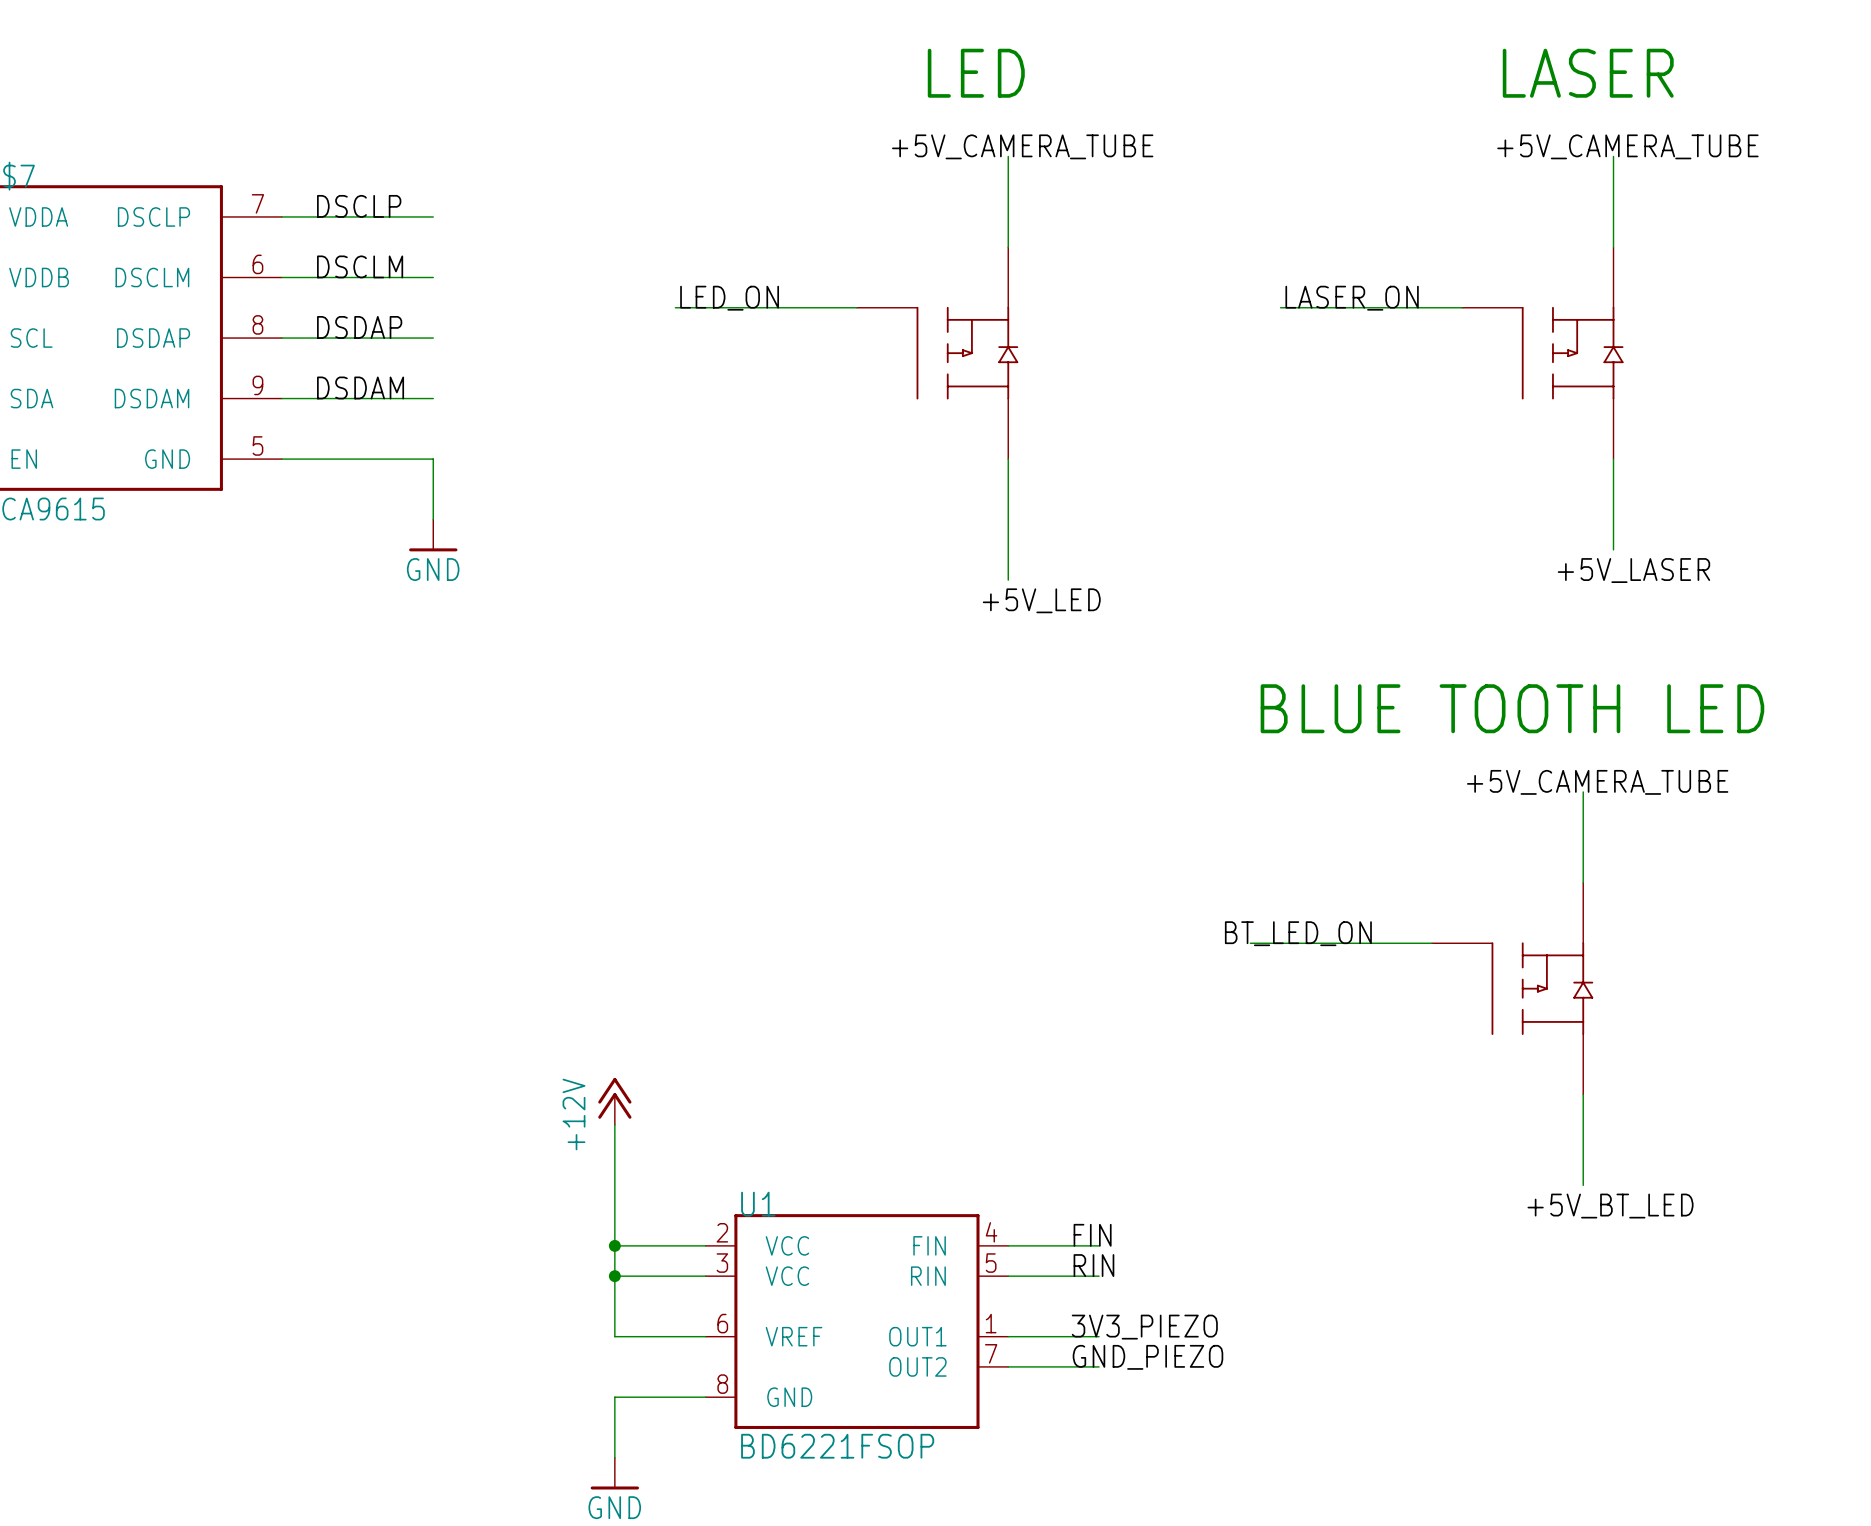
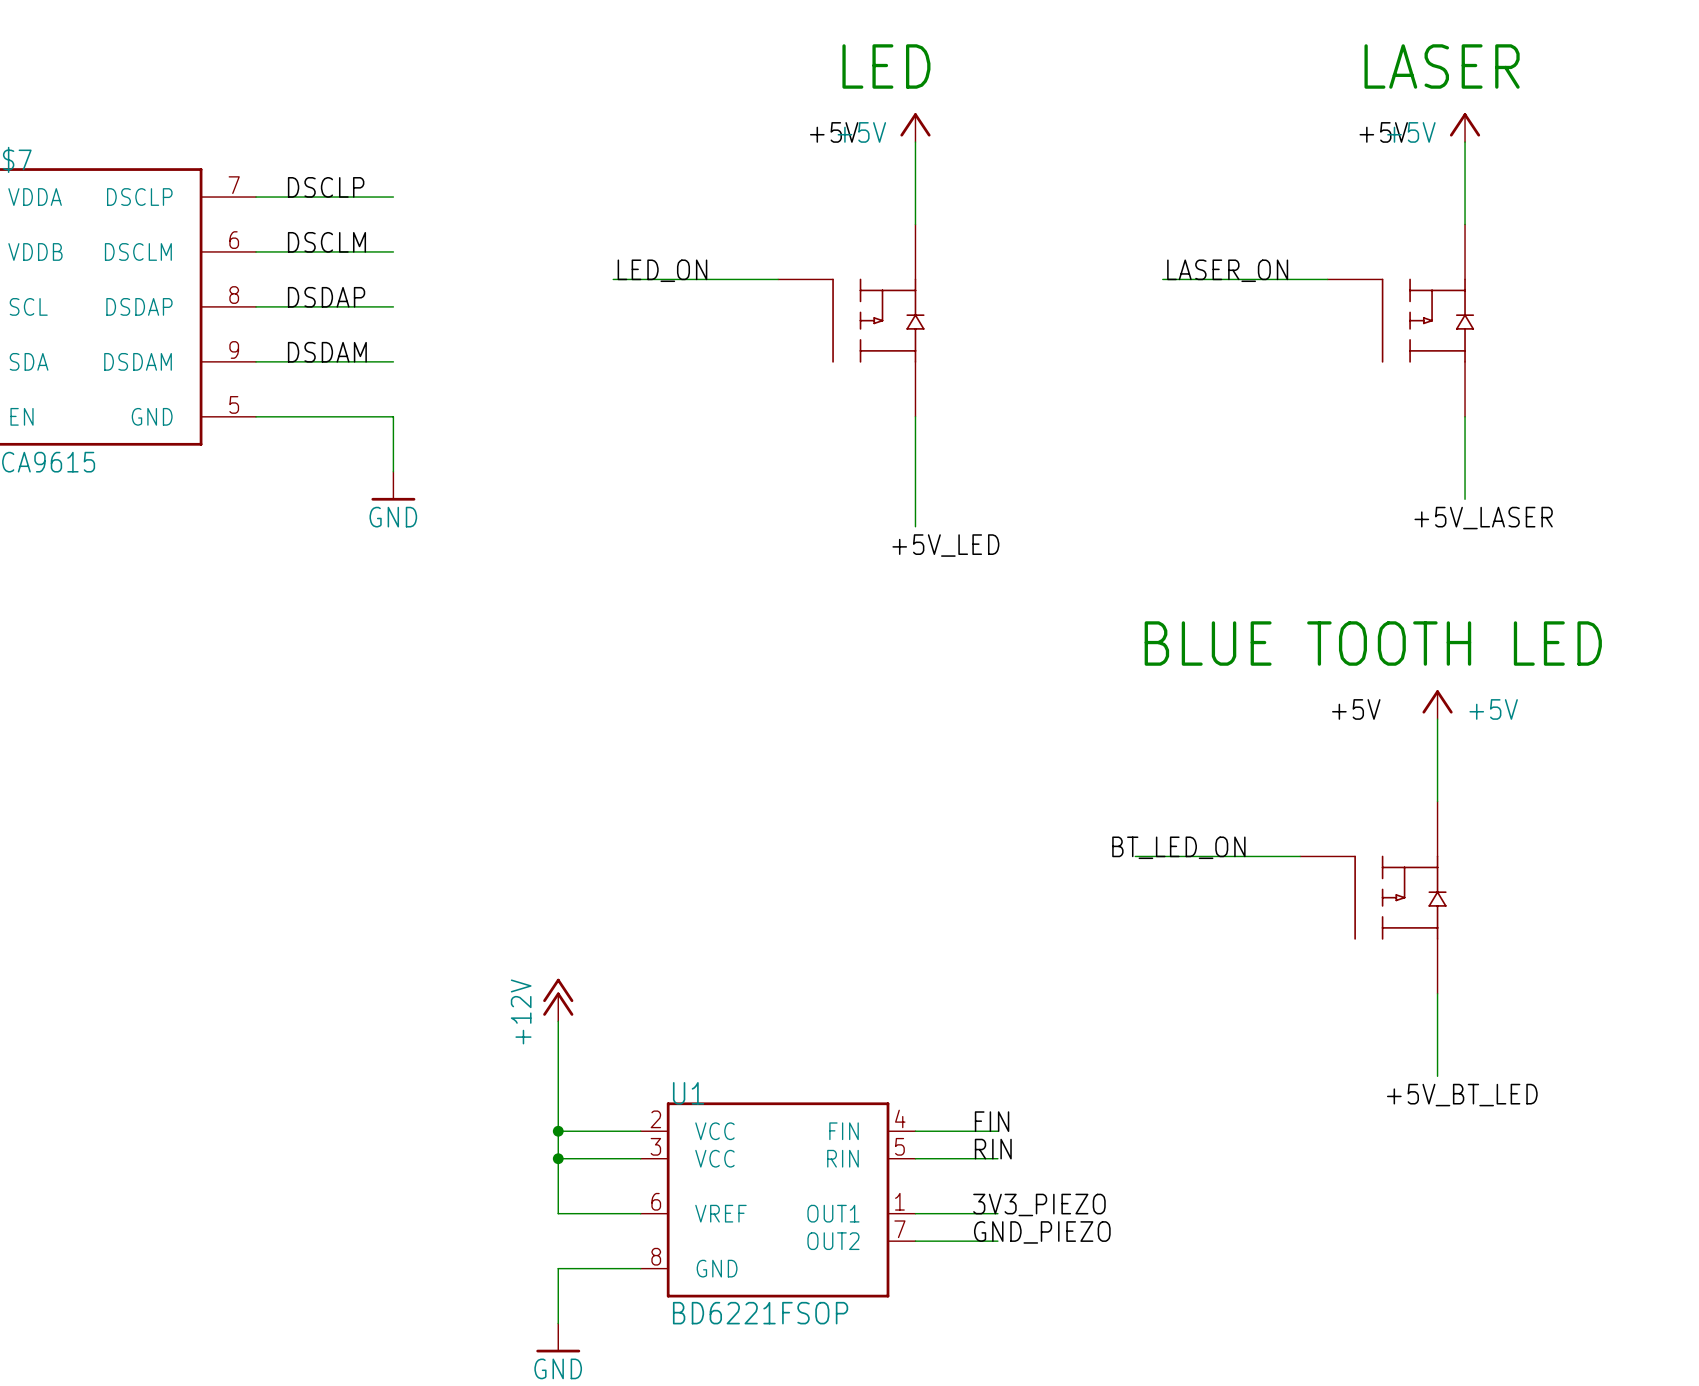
power symbol: none -> +5V (915, 127)
power symbol: none -> +5V (1465, 127)
label: +5V_CAMERA_TUBE (1022, 146) -> +5V (834, 132)
label: +5V_CAMERA_TUBE (1627, 146) -> +5V (1383, 132)
power symbol: none -> +5V (1437, 704)
label: +5V_CAMERA_TUBE (1597, 782) -> +5V (1356, 709)

